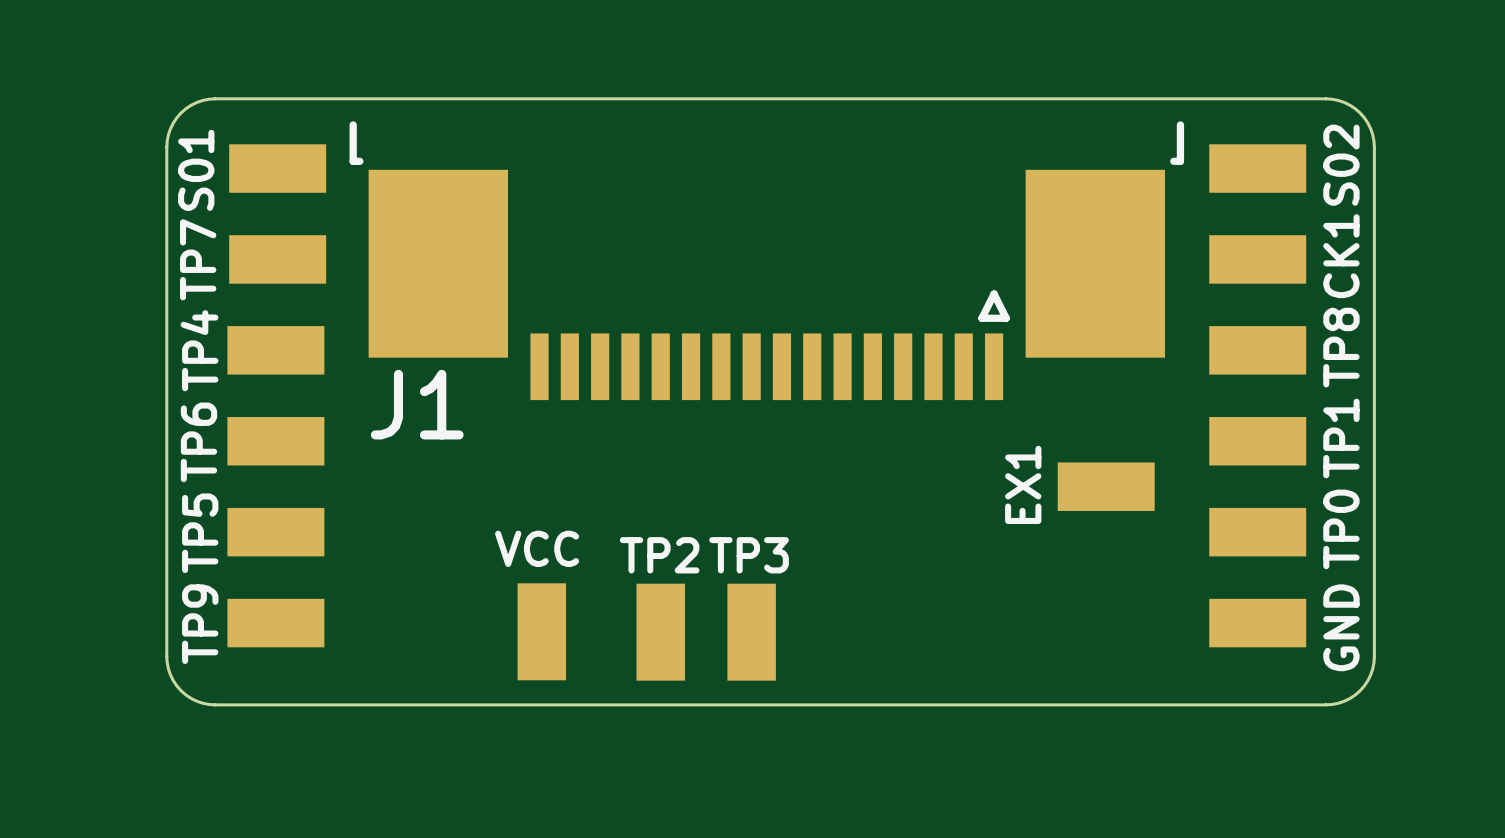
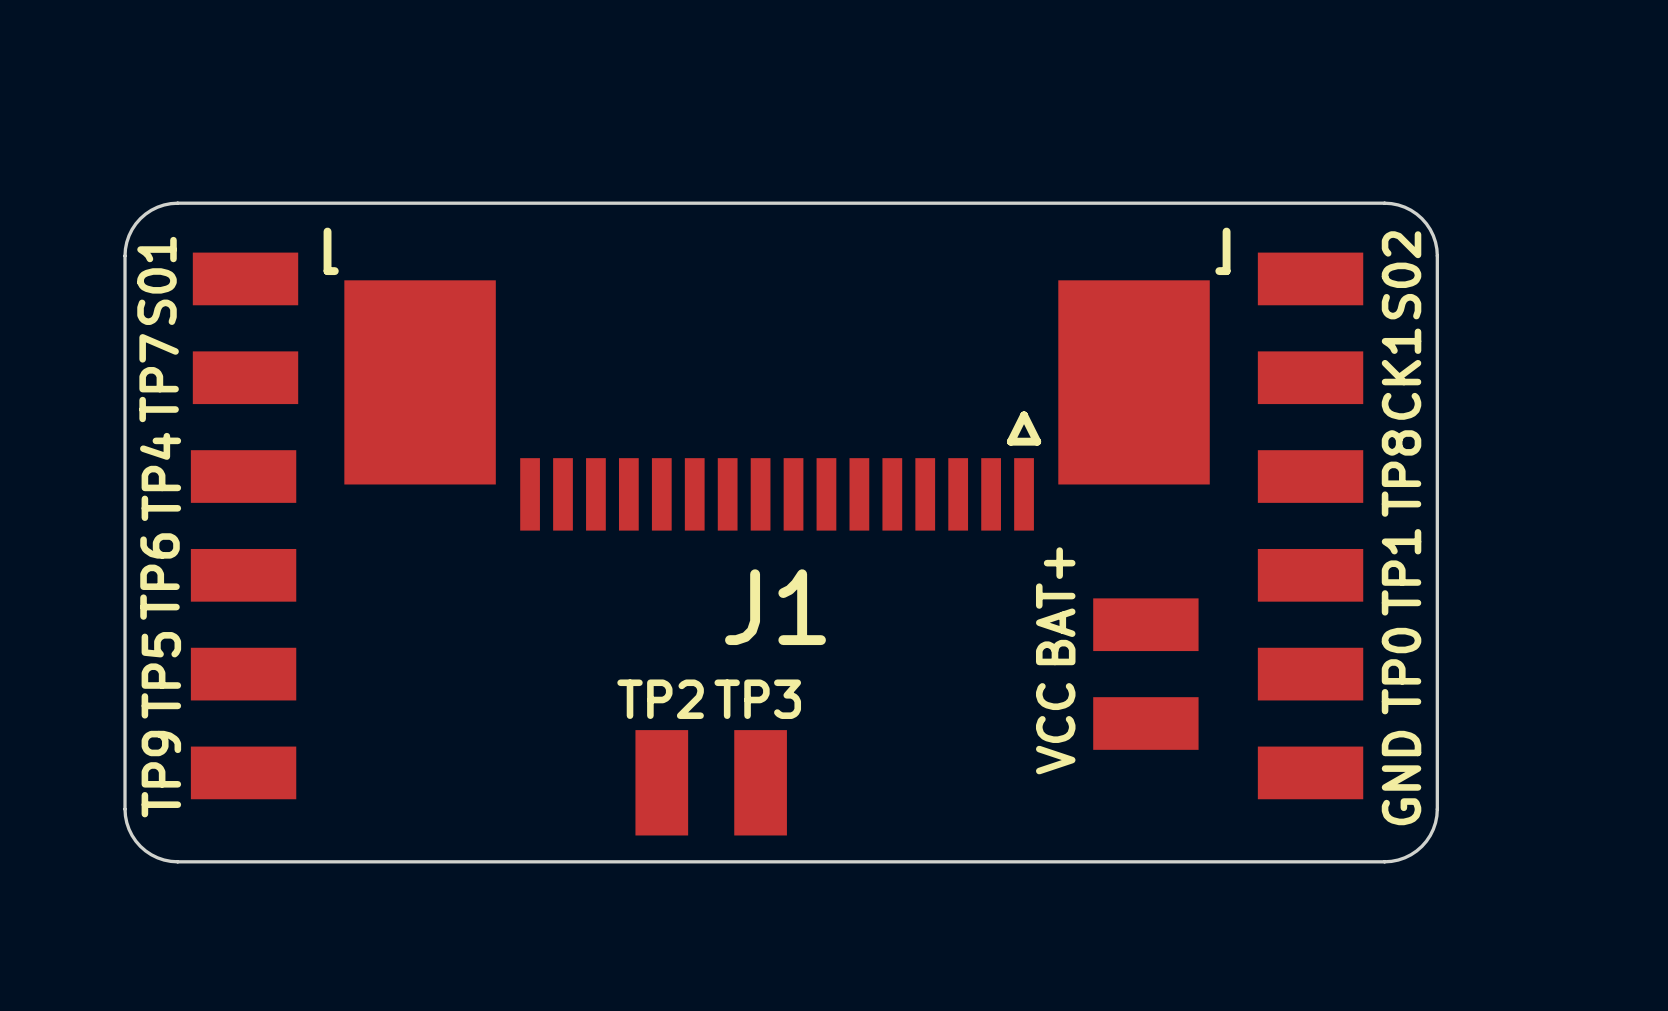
J1 name position: J1 (417, 404) -> J1 (775, 607)
part value: EX1 (1023, 484) -> BAT+ (1055, 606)
part rotation: 0° (541, 631) -> 90° clockwise (1145, 723)
part position: (541, 631) -> (1145, 723)

